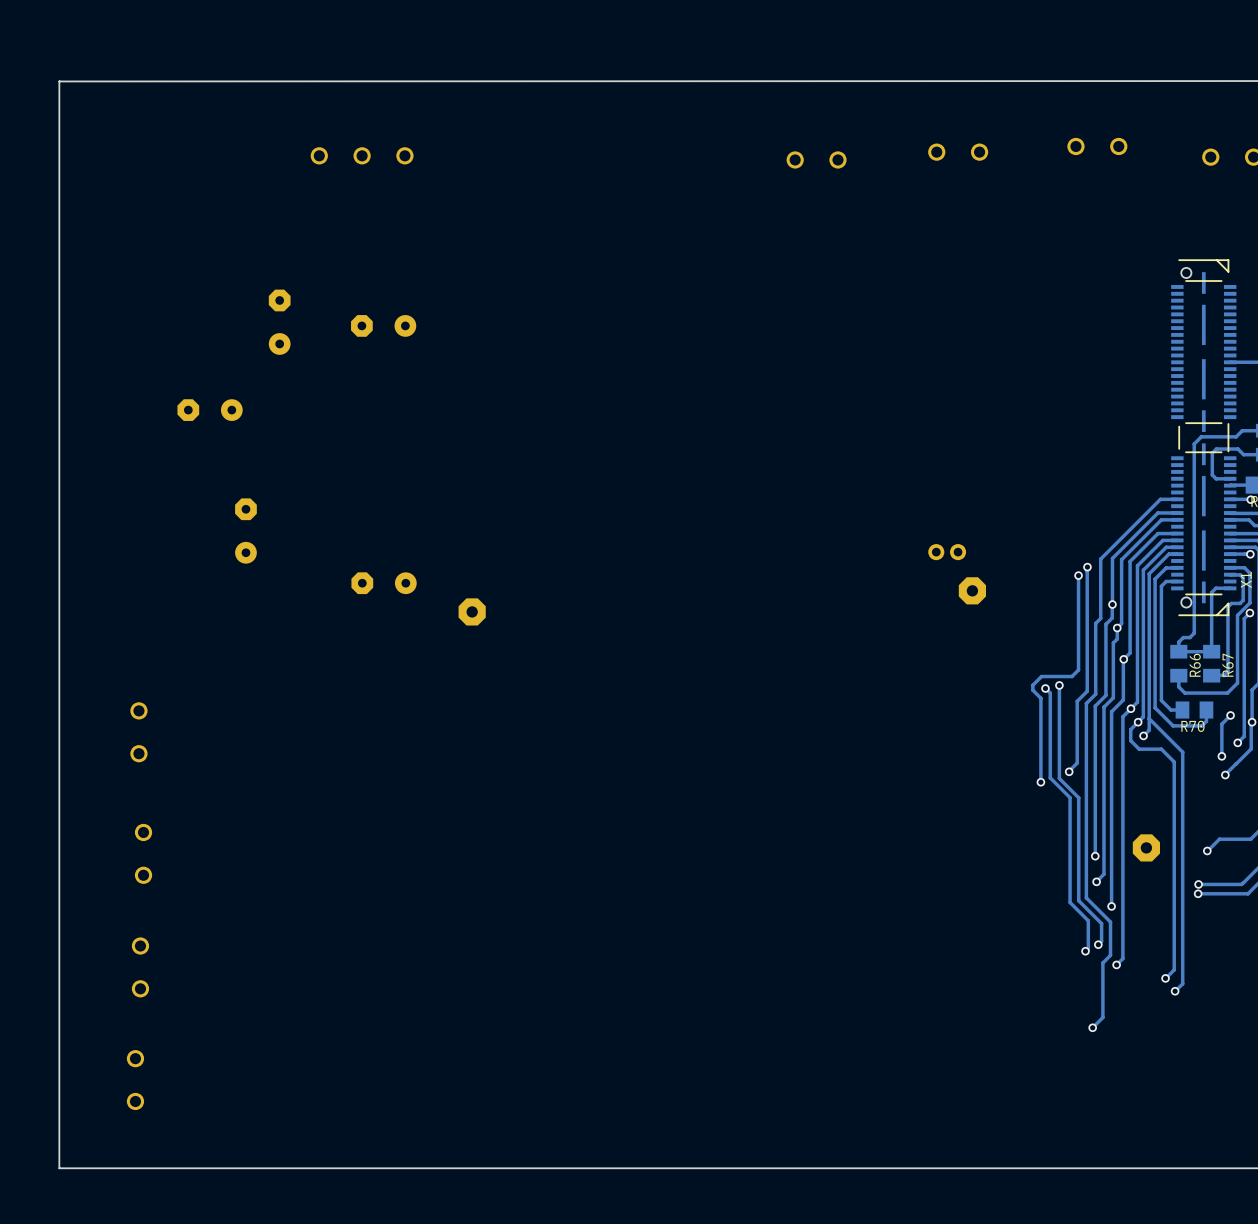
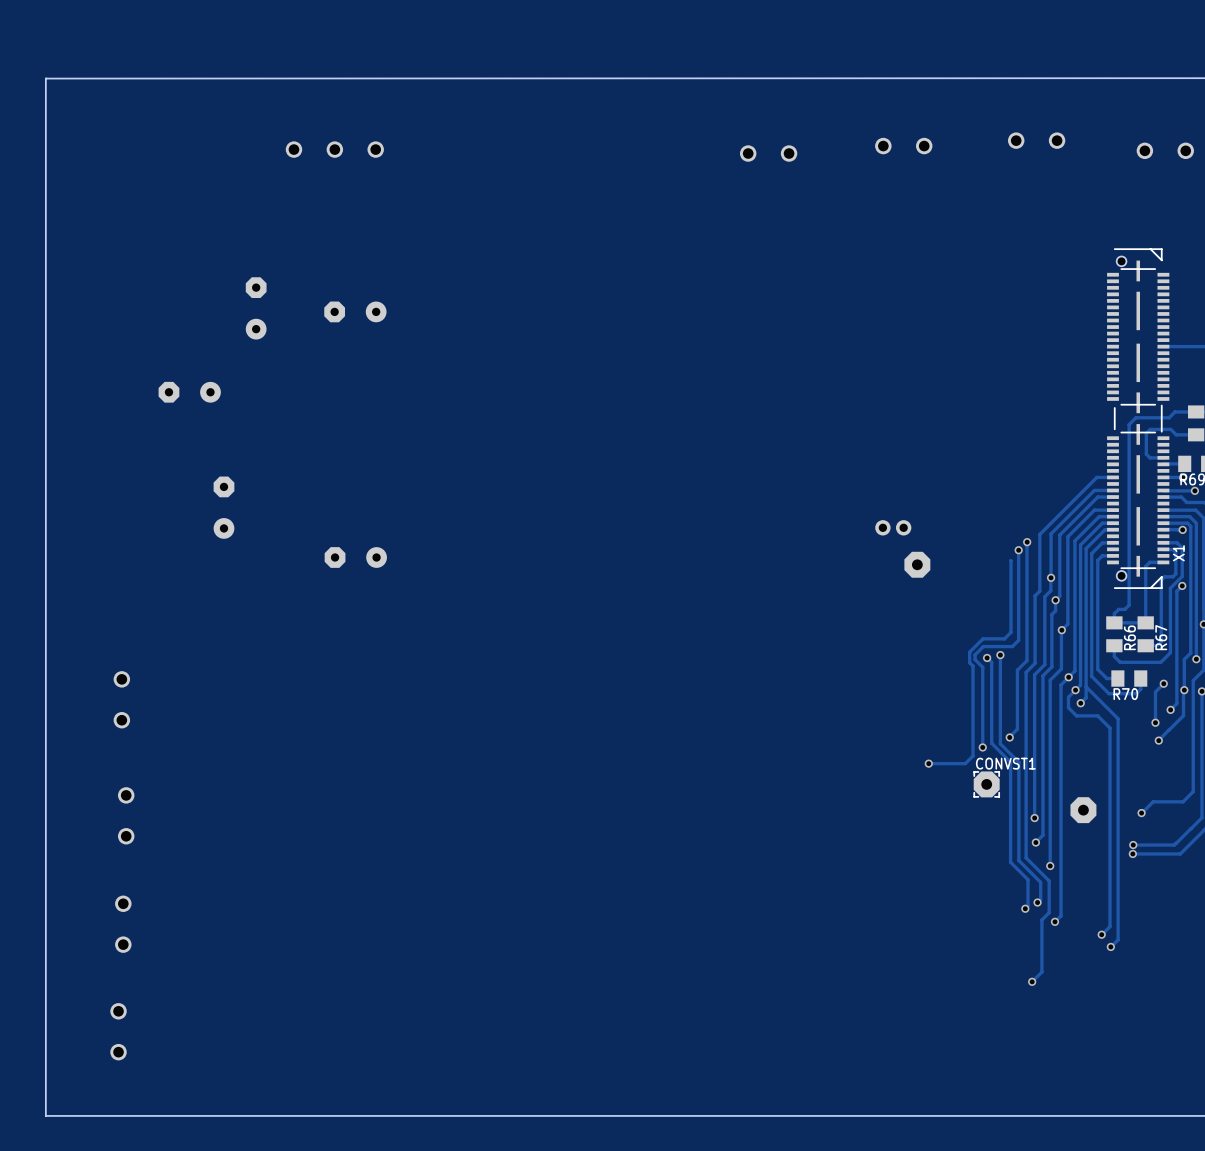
track: none -> (1010, 560) (1010, 632) (1004, 638) (982, 638) (969, 652) (969, 662) (973, 666) (973, 755) (965, 763) (928, 763)
part: (472, 611) -> none
via: none -> (928, 763)
CONVST1: none -> (986, 784)

